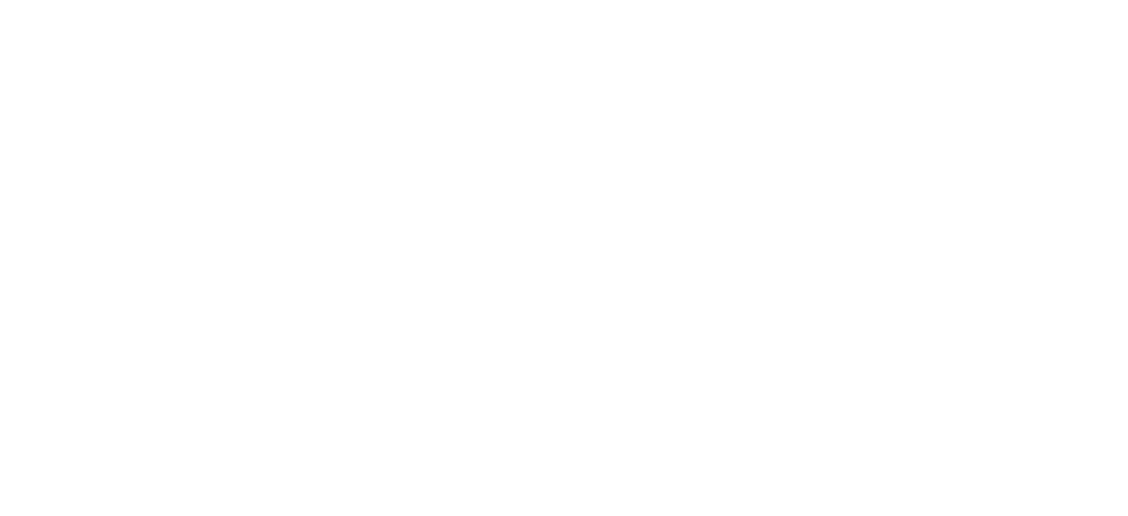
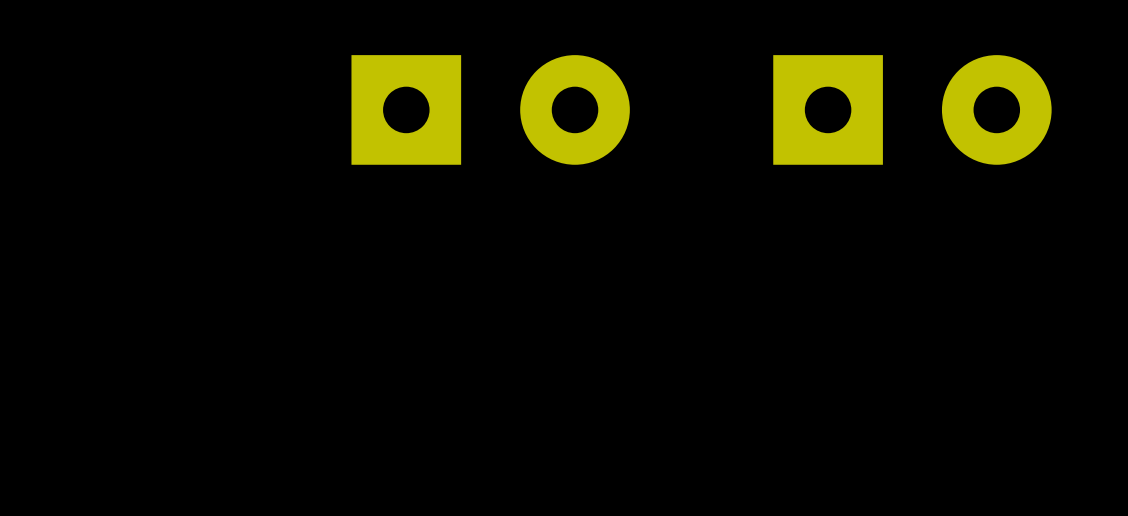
part: none -> (490, 109)
part: none -> (912, 109)

